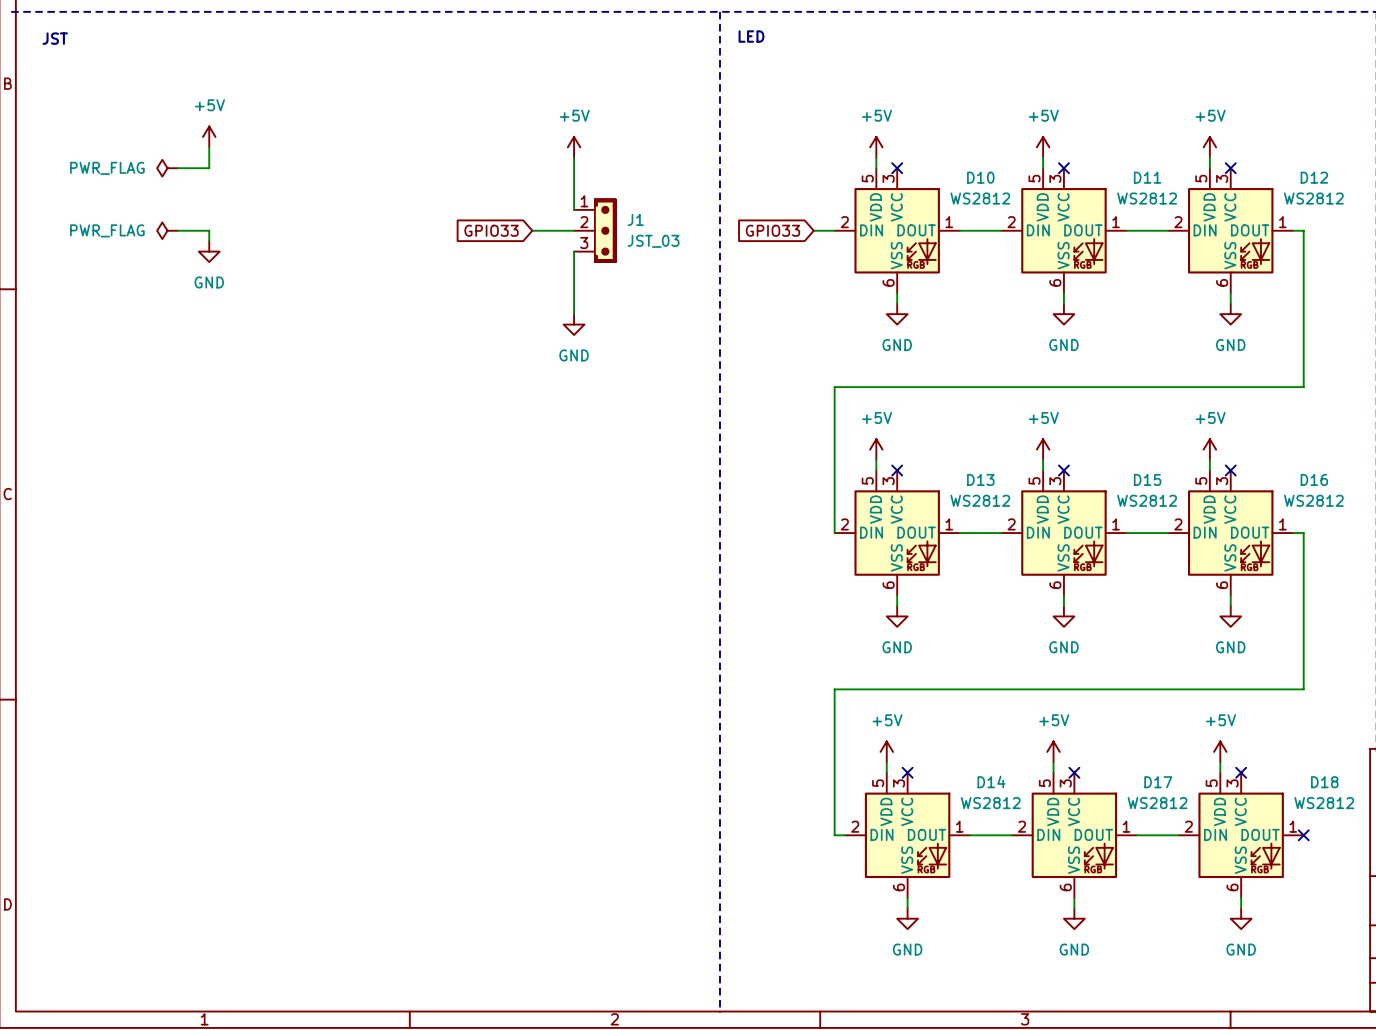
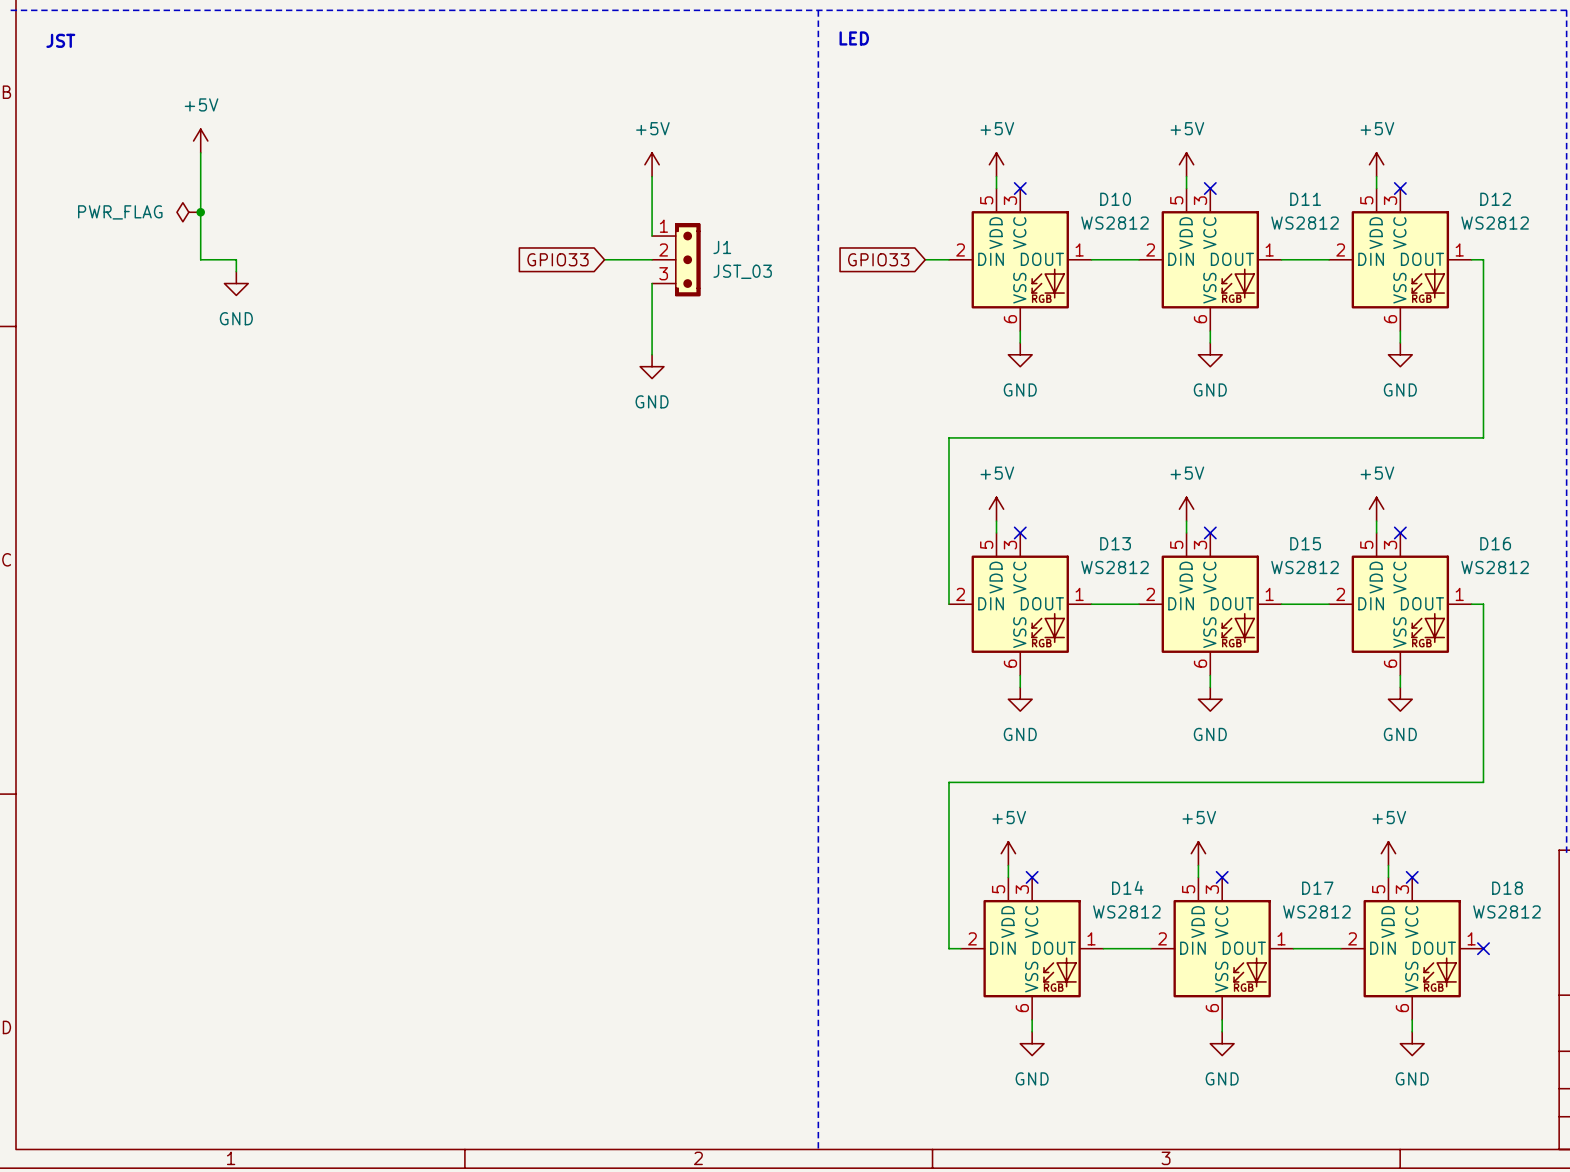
wire: none -> (200, 152) (200, 259)
power symbol position: +5V (209, 136) -> +5V (200, 141)
wire: (209, 147) (209, 168) (177, 168) -> none
power symbol: PWR_FLAG (167, 168) -> none
power symbol: none -> PWR_FLAG (188, 212)
junction: none -> (200, 212)
power symbol: PWR_FLAG (167, 230) -> none

